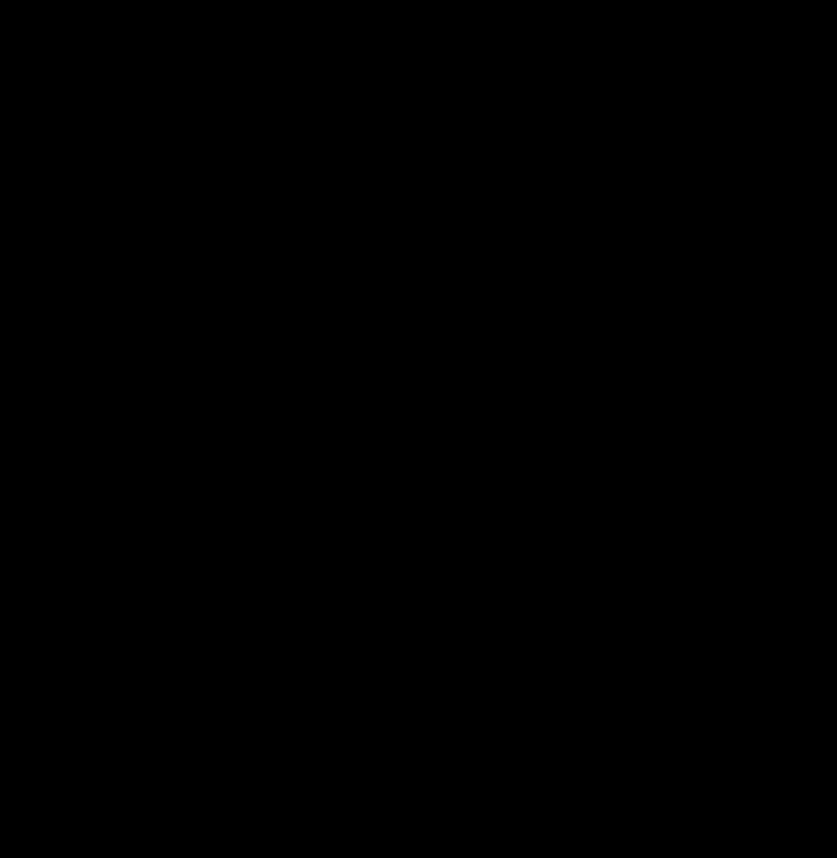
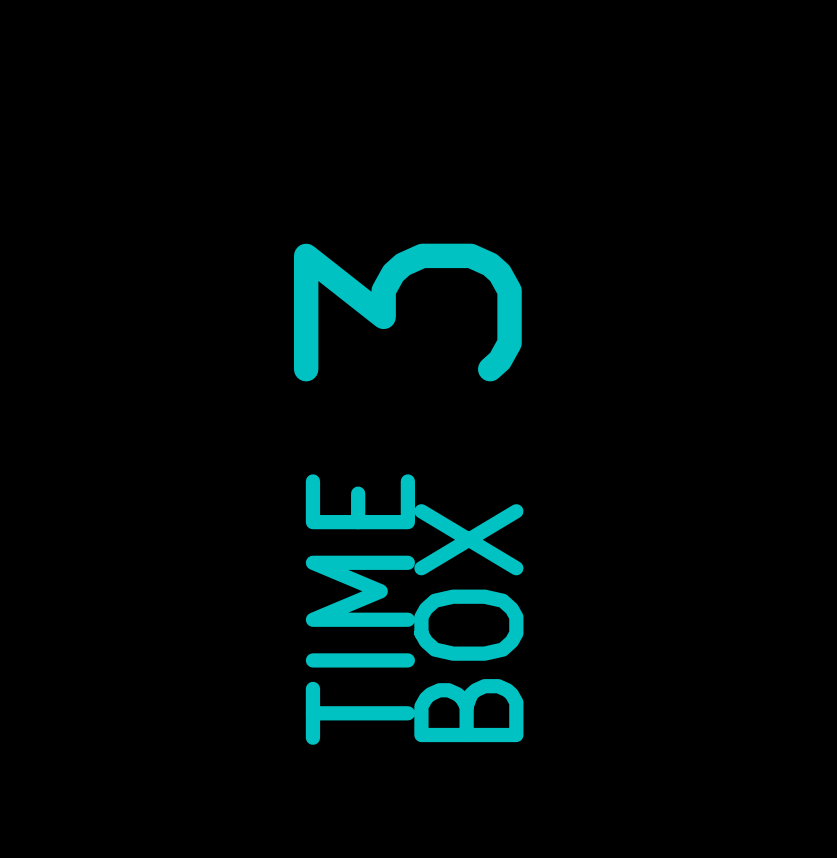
text: none -> 3 (407, 312)
text: none -> TIME (360, 609)
text: none -> BOX (468, 623)

